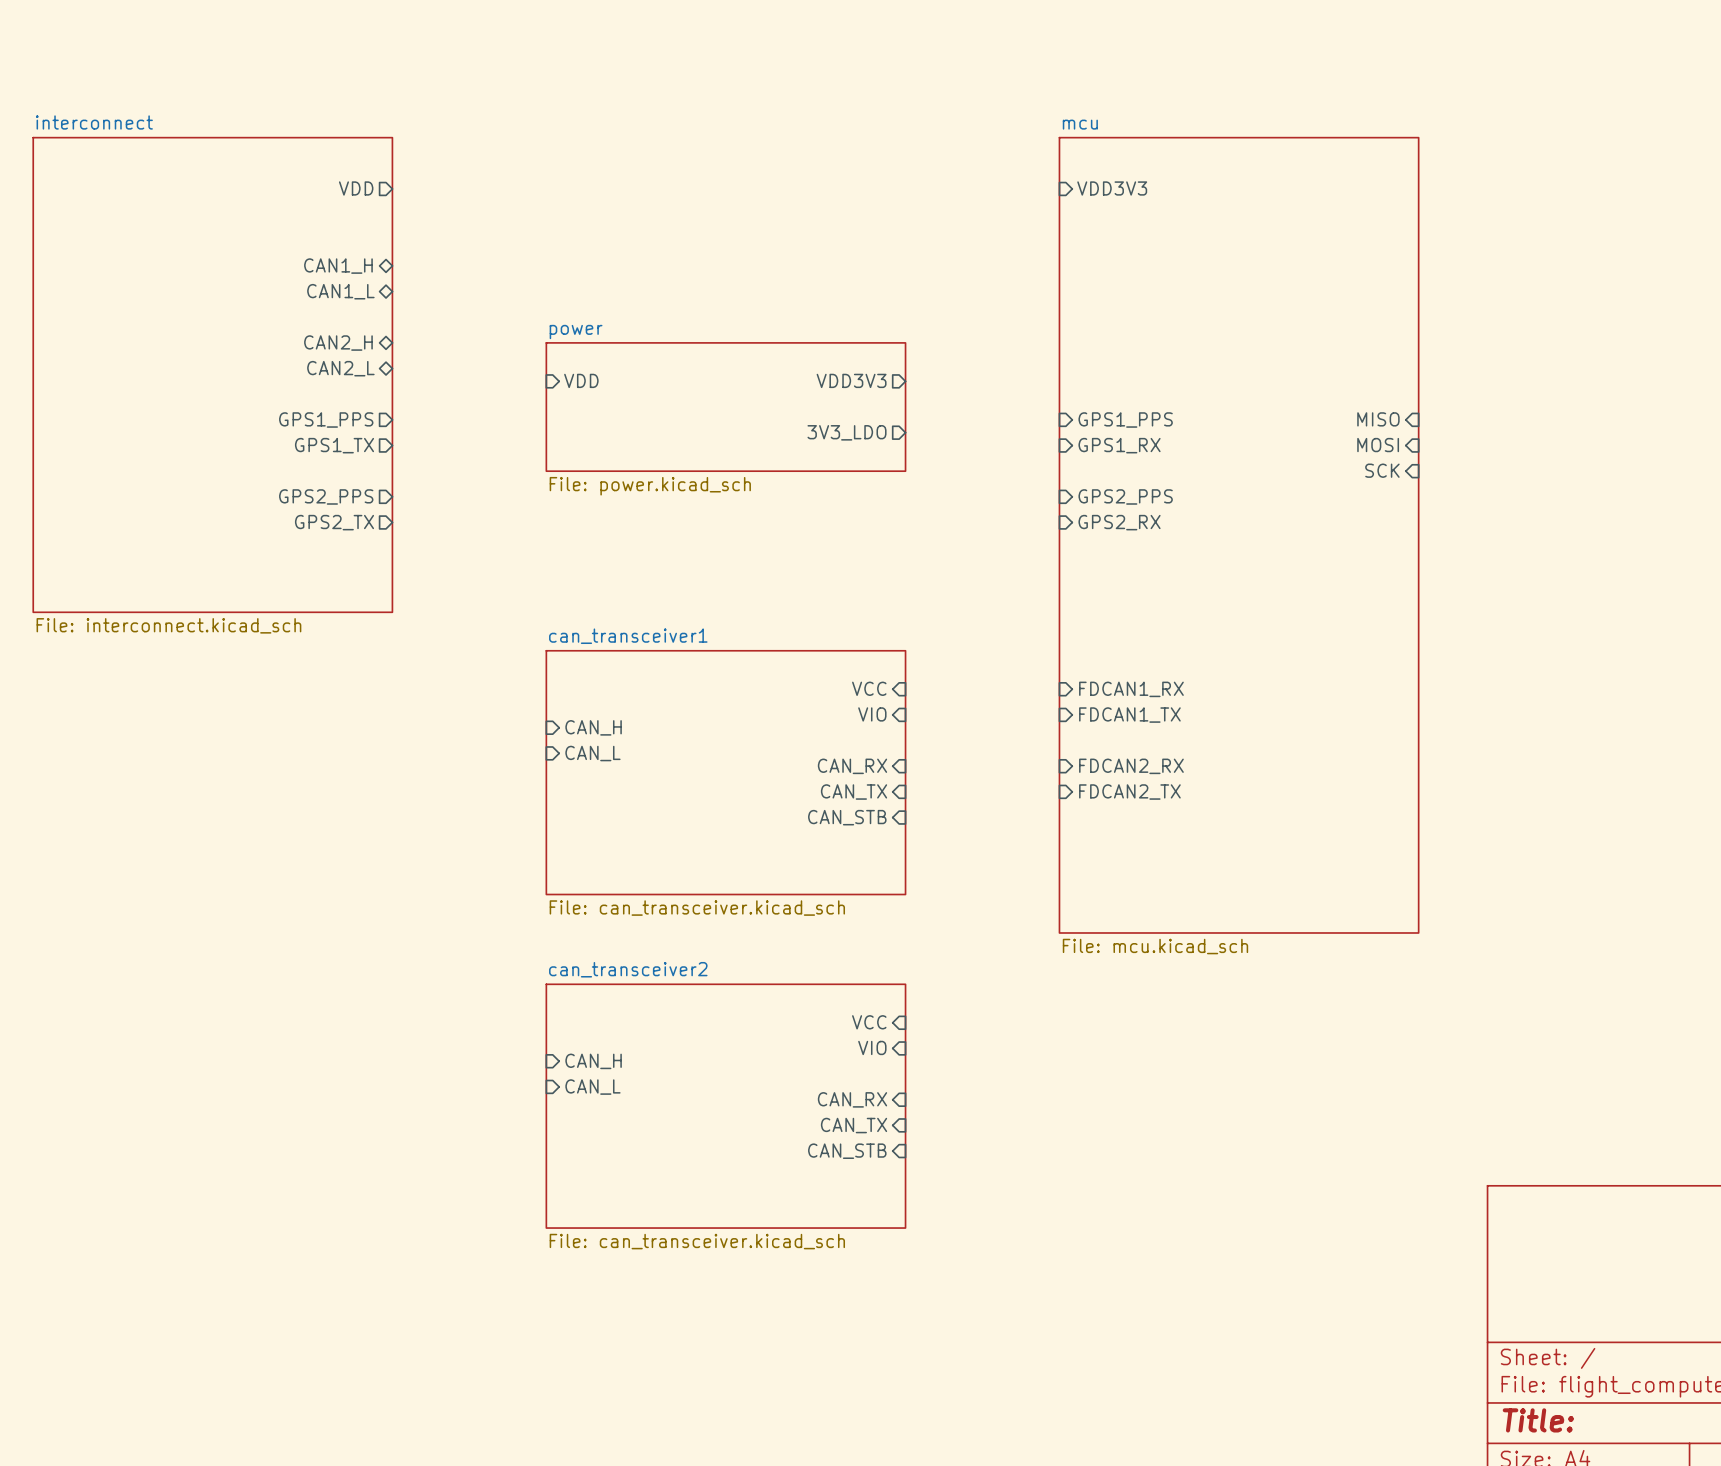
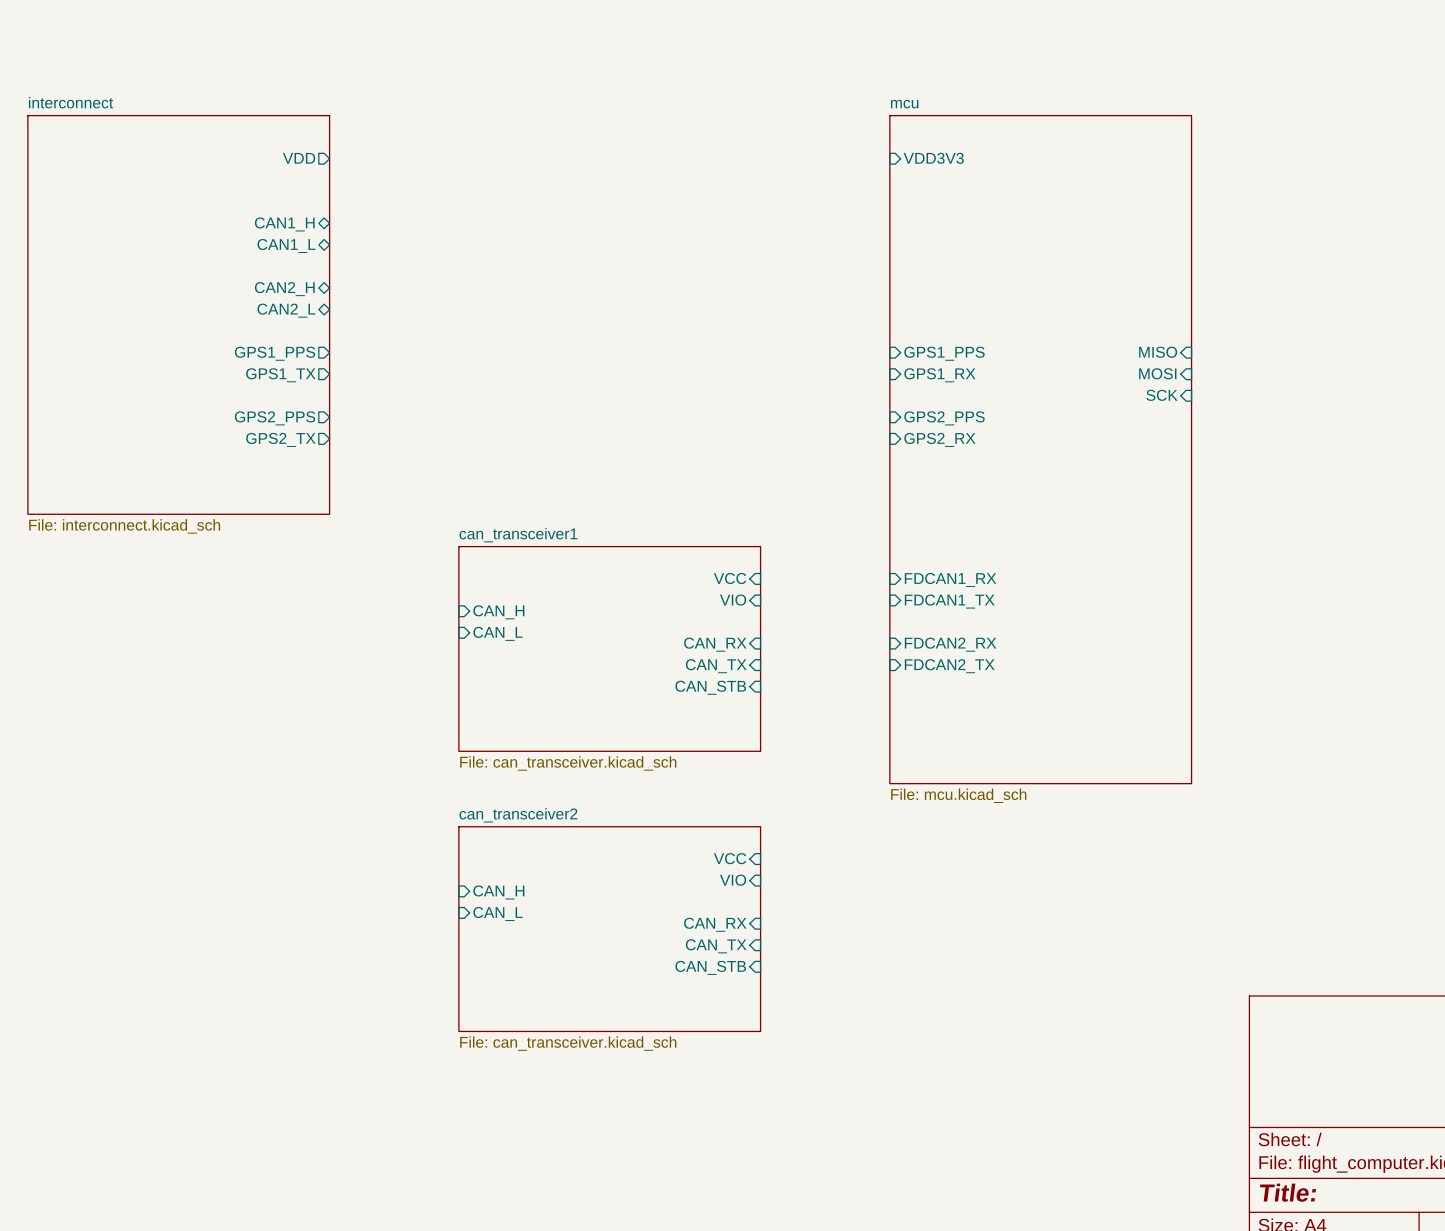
sheet pin: VDD (581, 380) -> none
sheet pin: VDD3V3 (851, 380) -> none
sheet power: File: power.kicad_sch (725, 407) -> none
sheet pin: 3V3_LDO (847, 432) -> none

